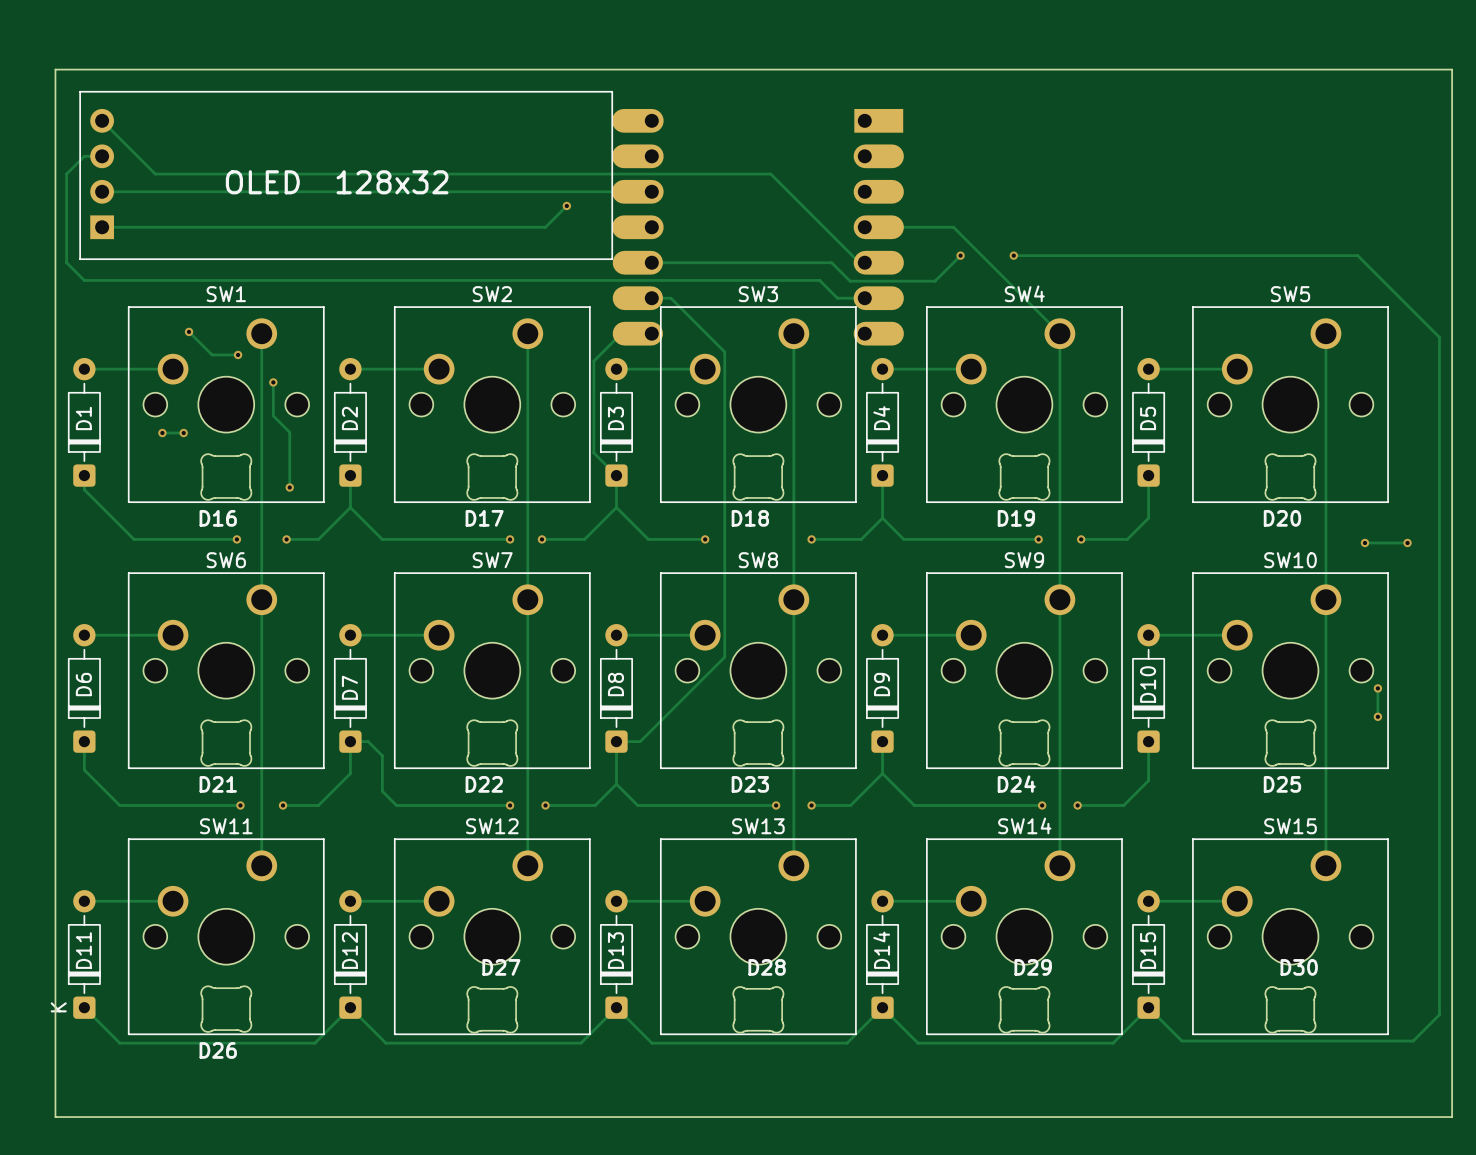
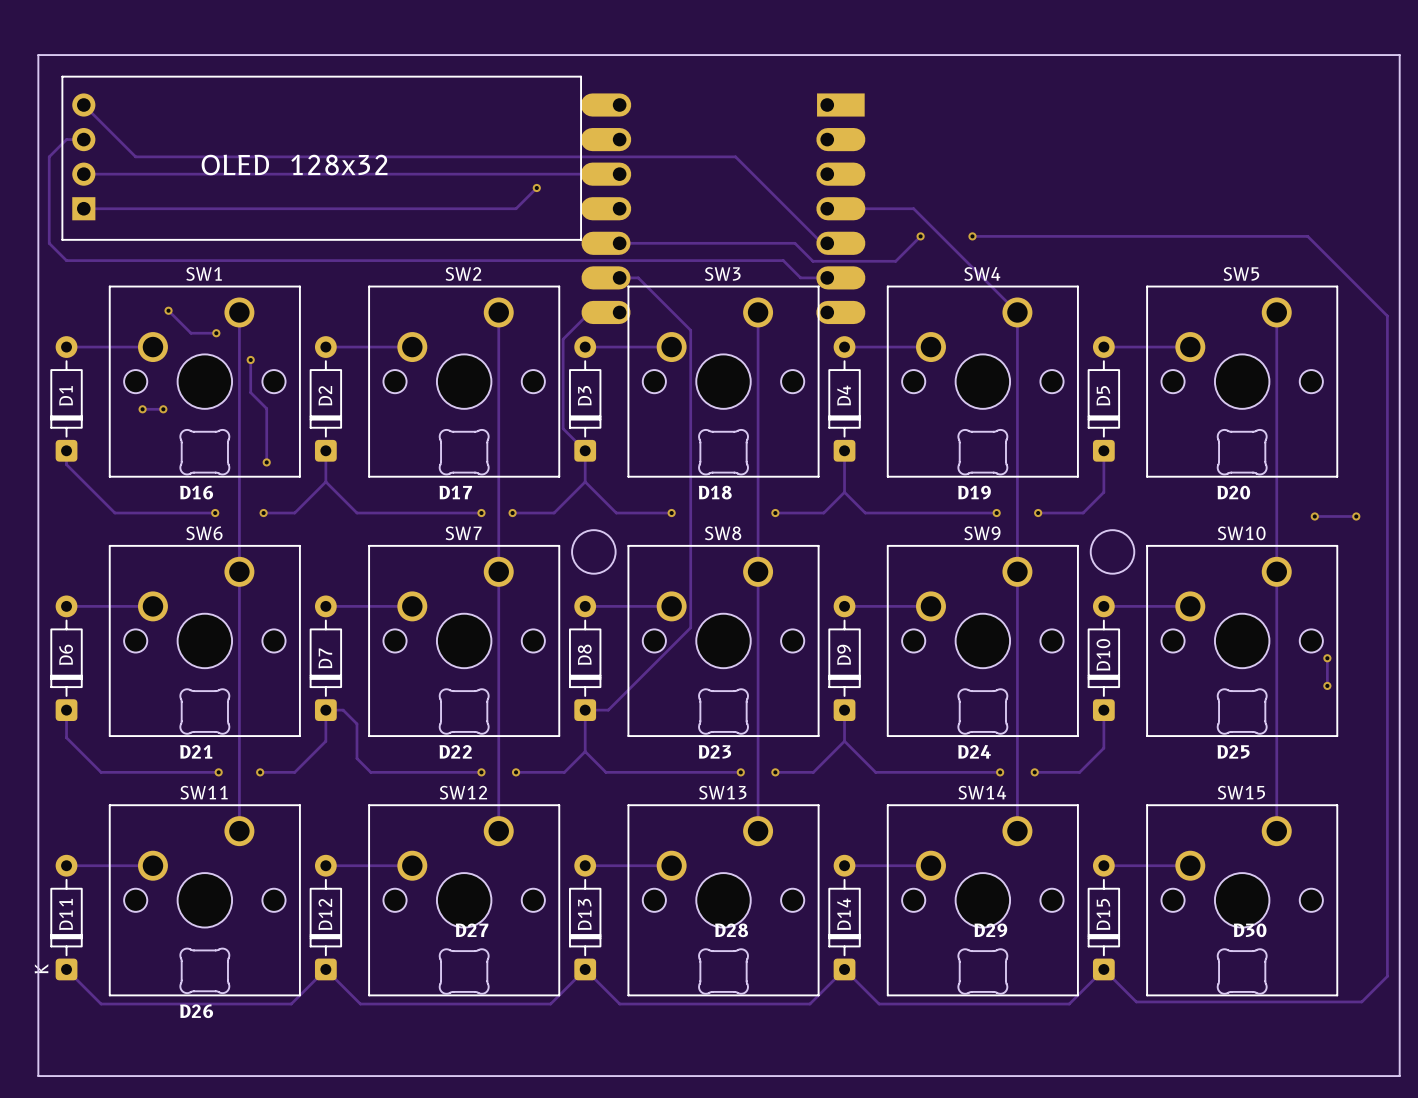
round board edge: none -> [571, 529, 616, 575]
round board edge: none -> [1090, 529, 1135, 575]

